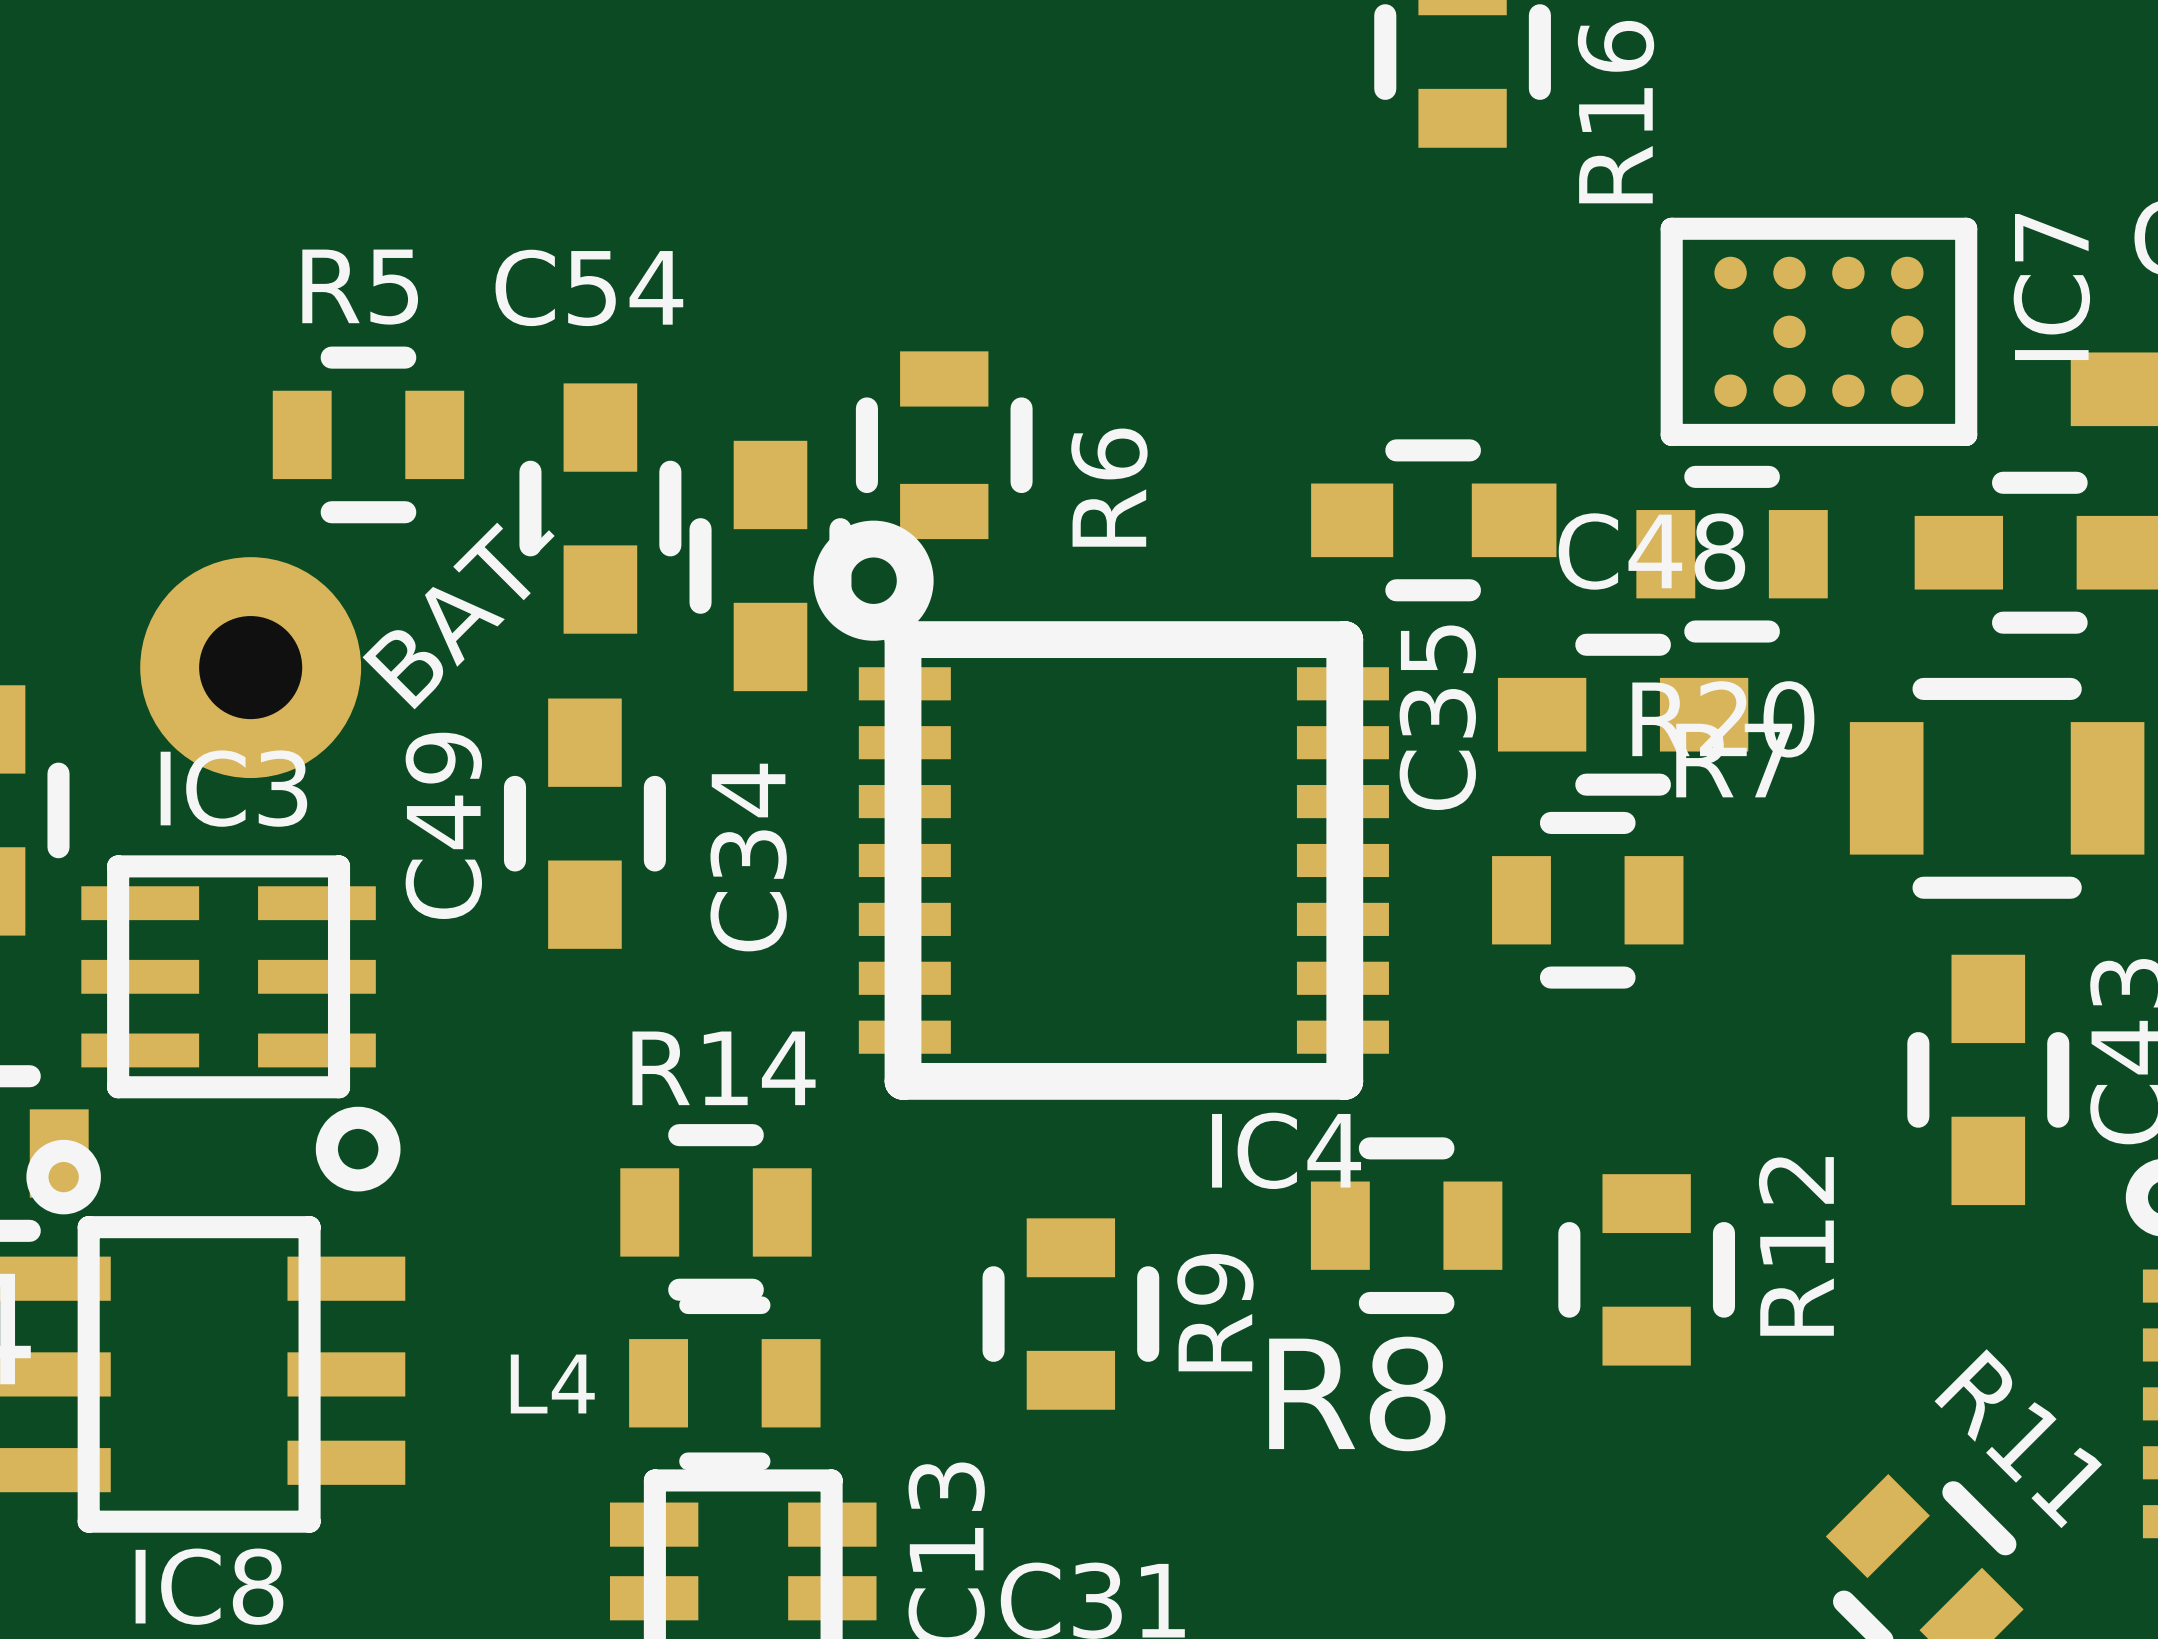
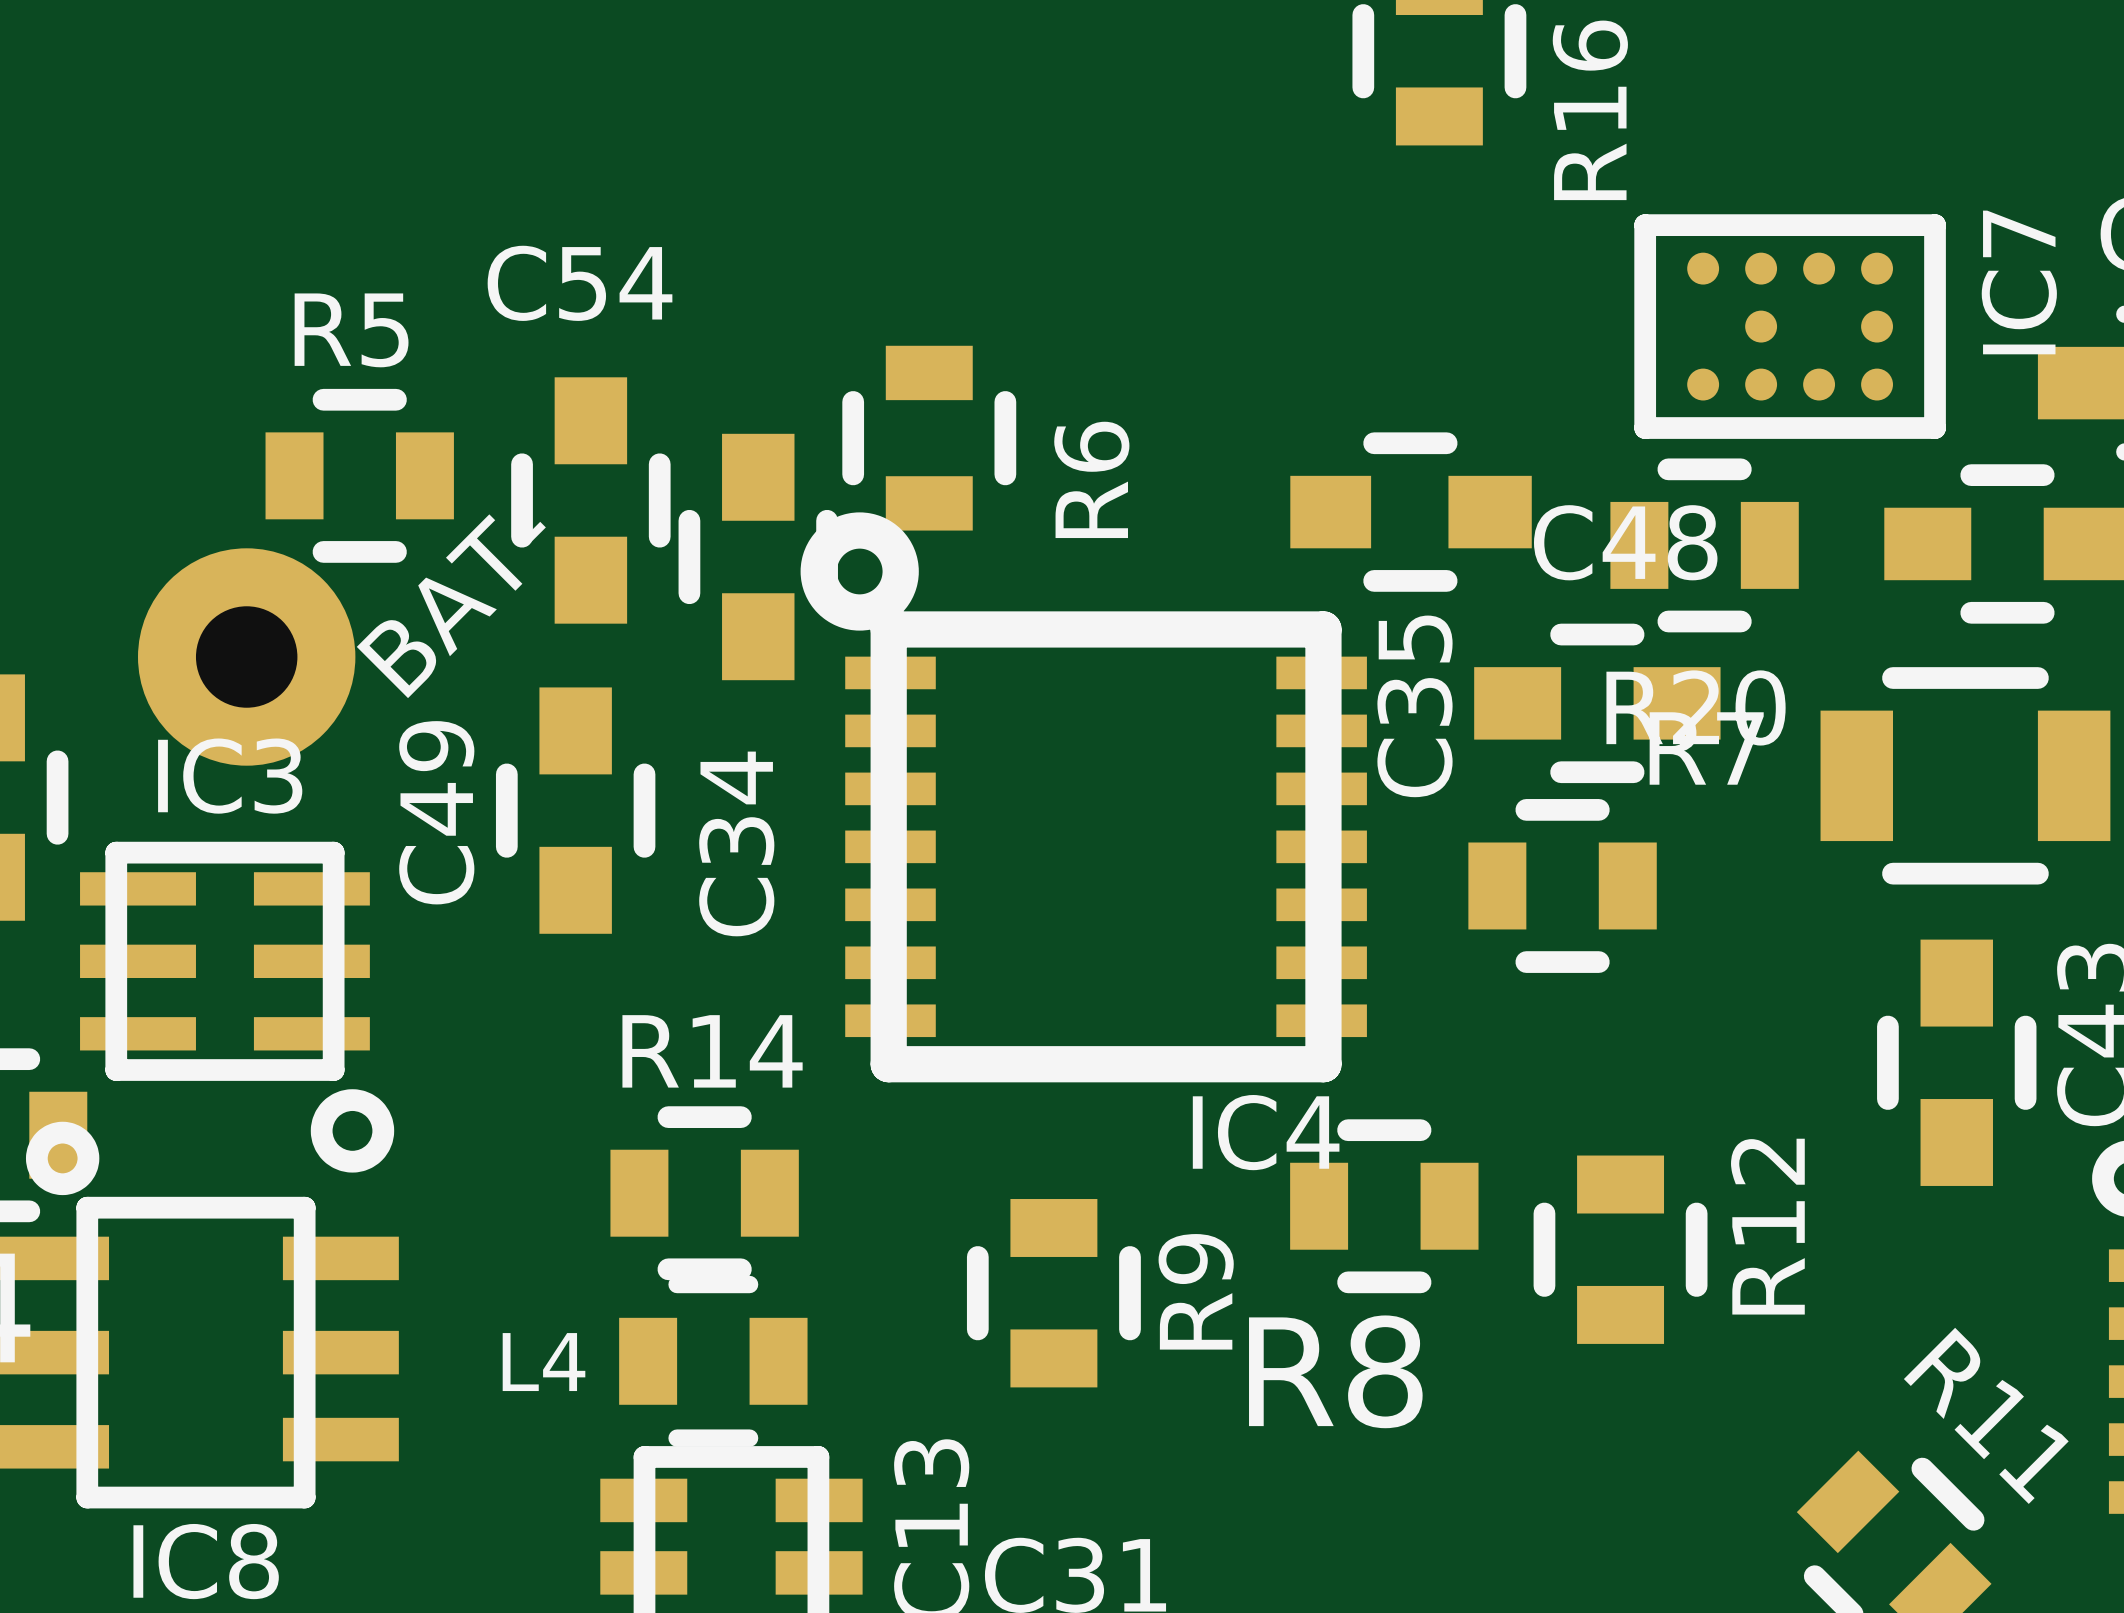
R5 position: (368, 434) -> (359, 475)

